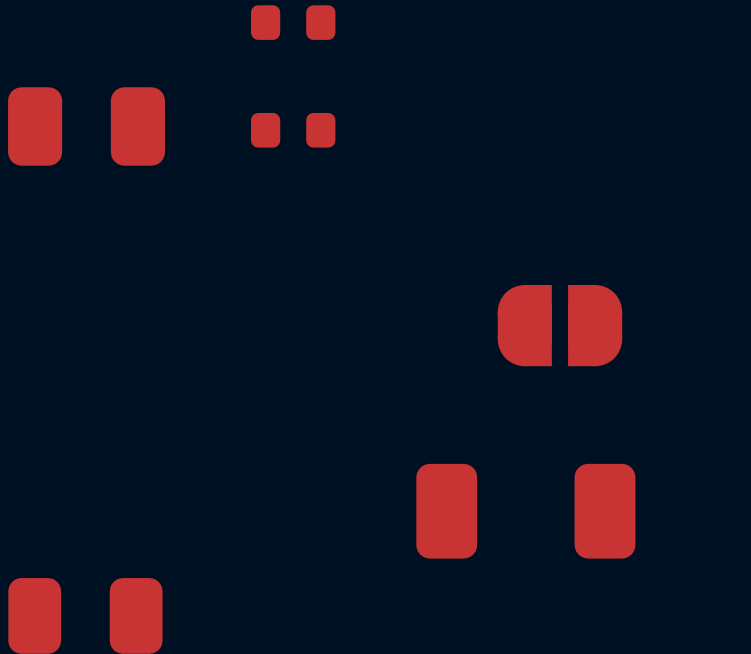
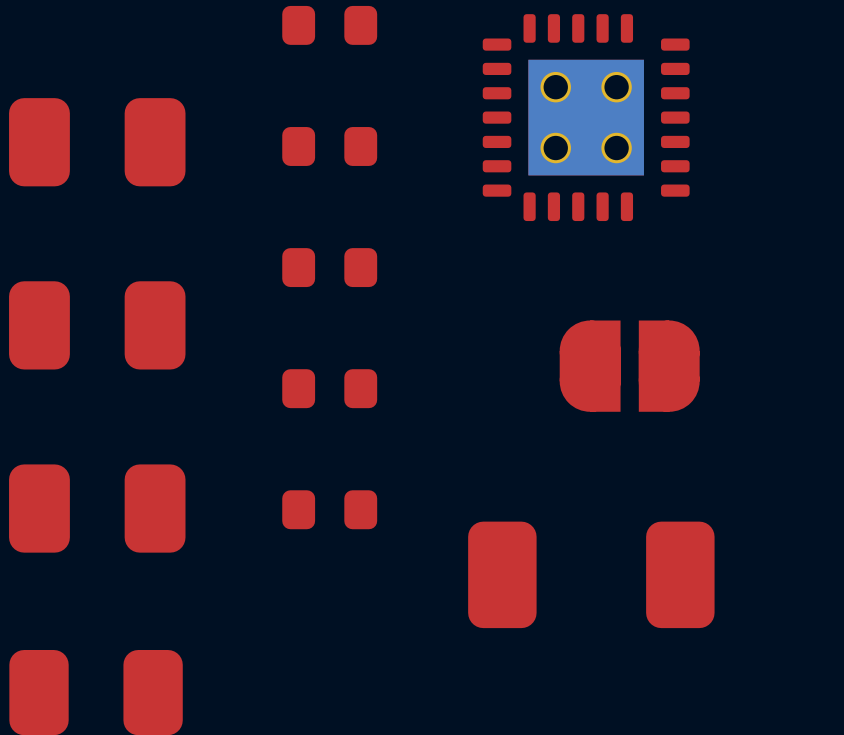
part: none -> (586, 117)
part: none -> (329, 267)
part: none -> (97, 325)
part: none -> (329, 388)
part: none -> (97, 508)
part: none -> (329, 509)

